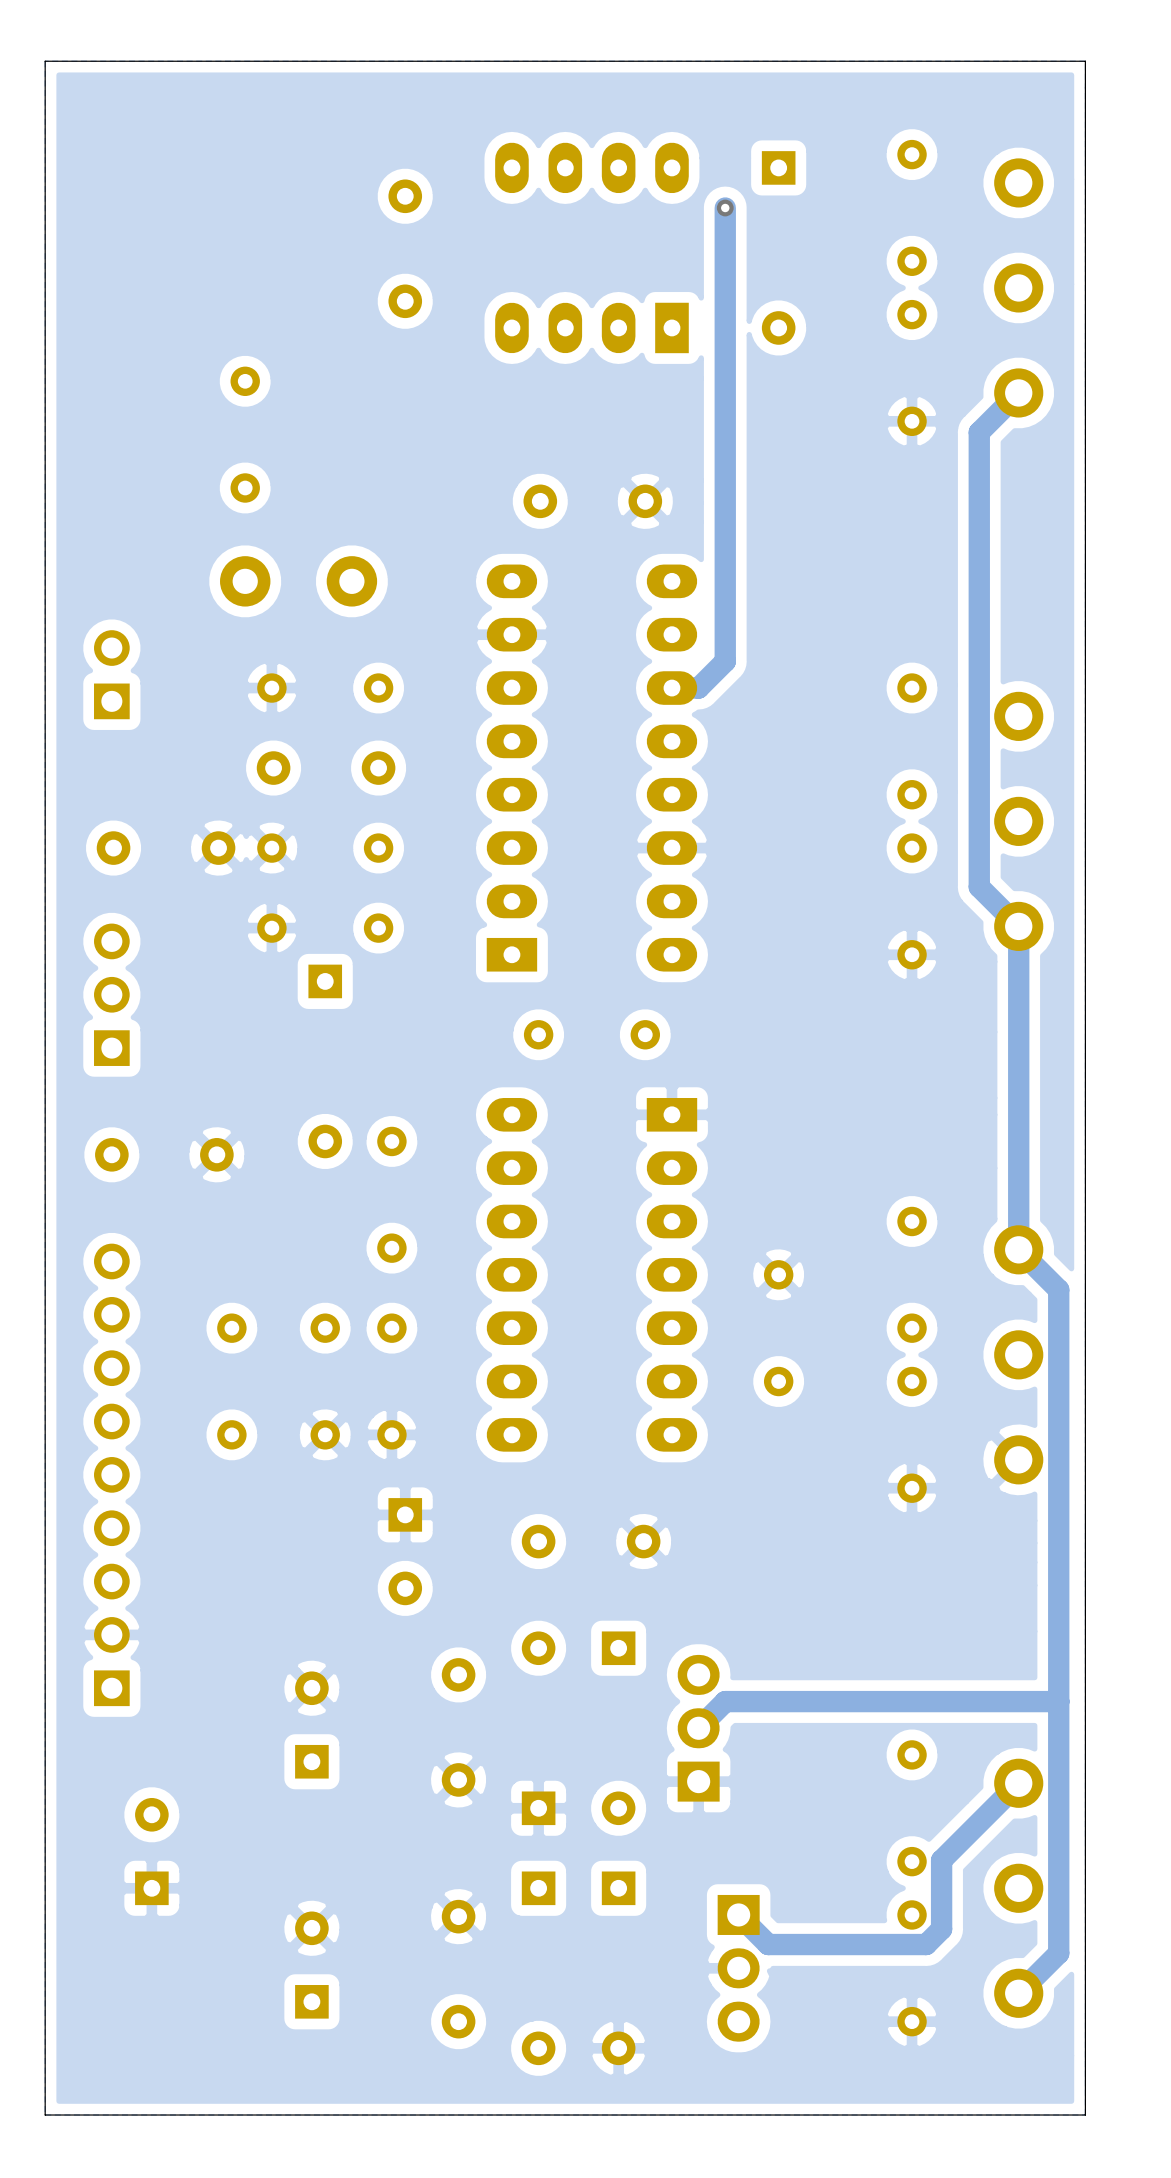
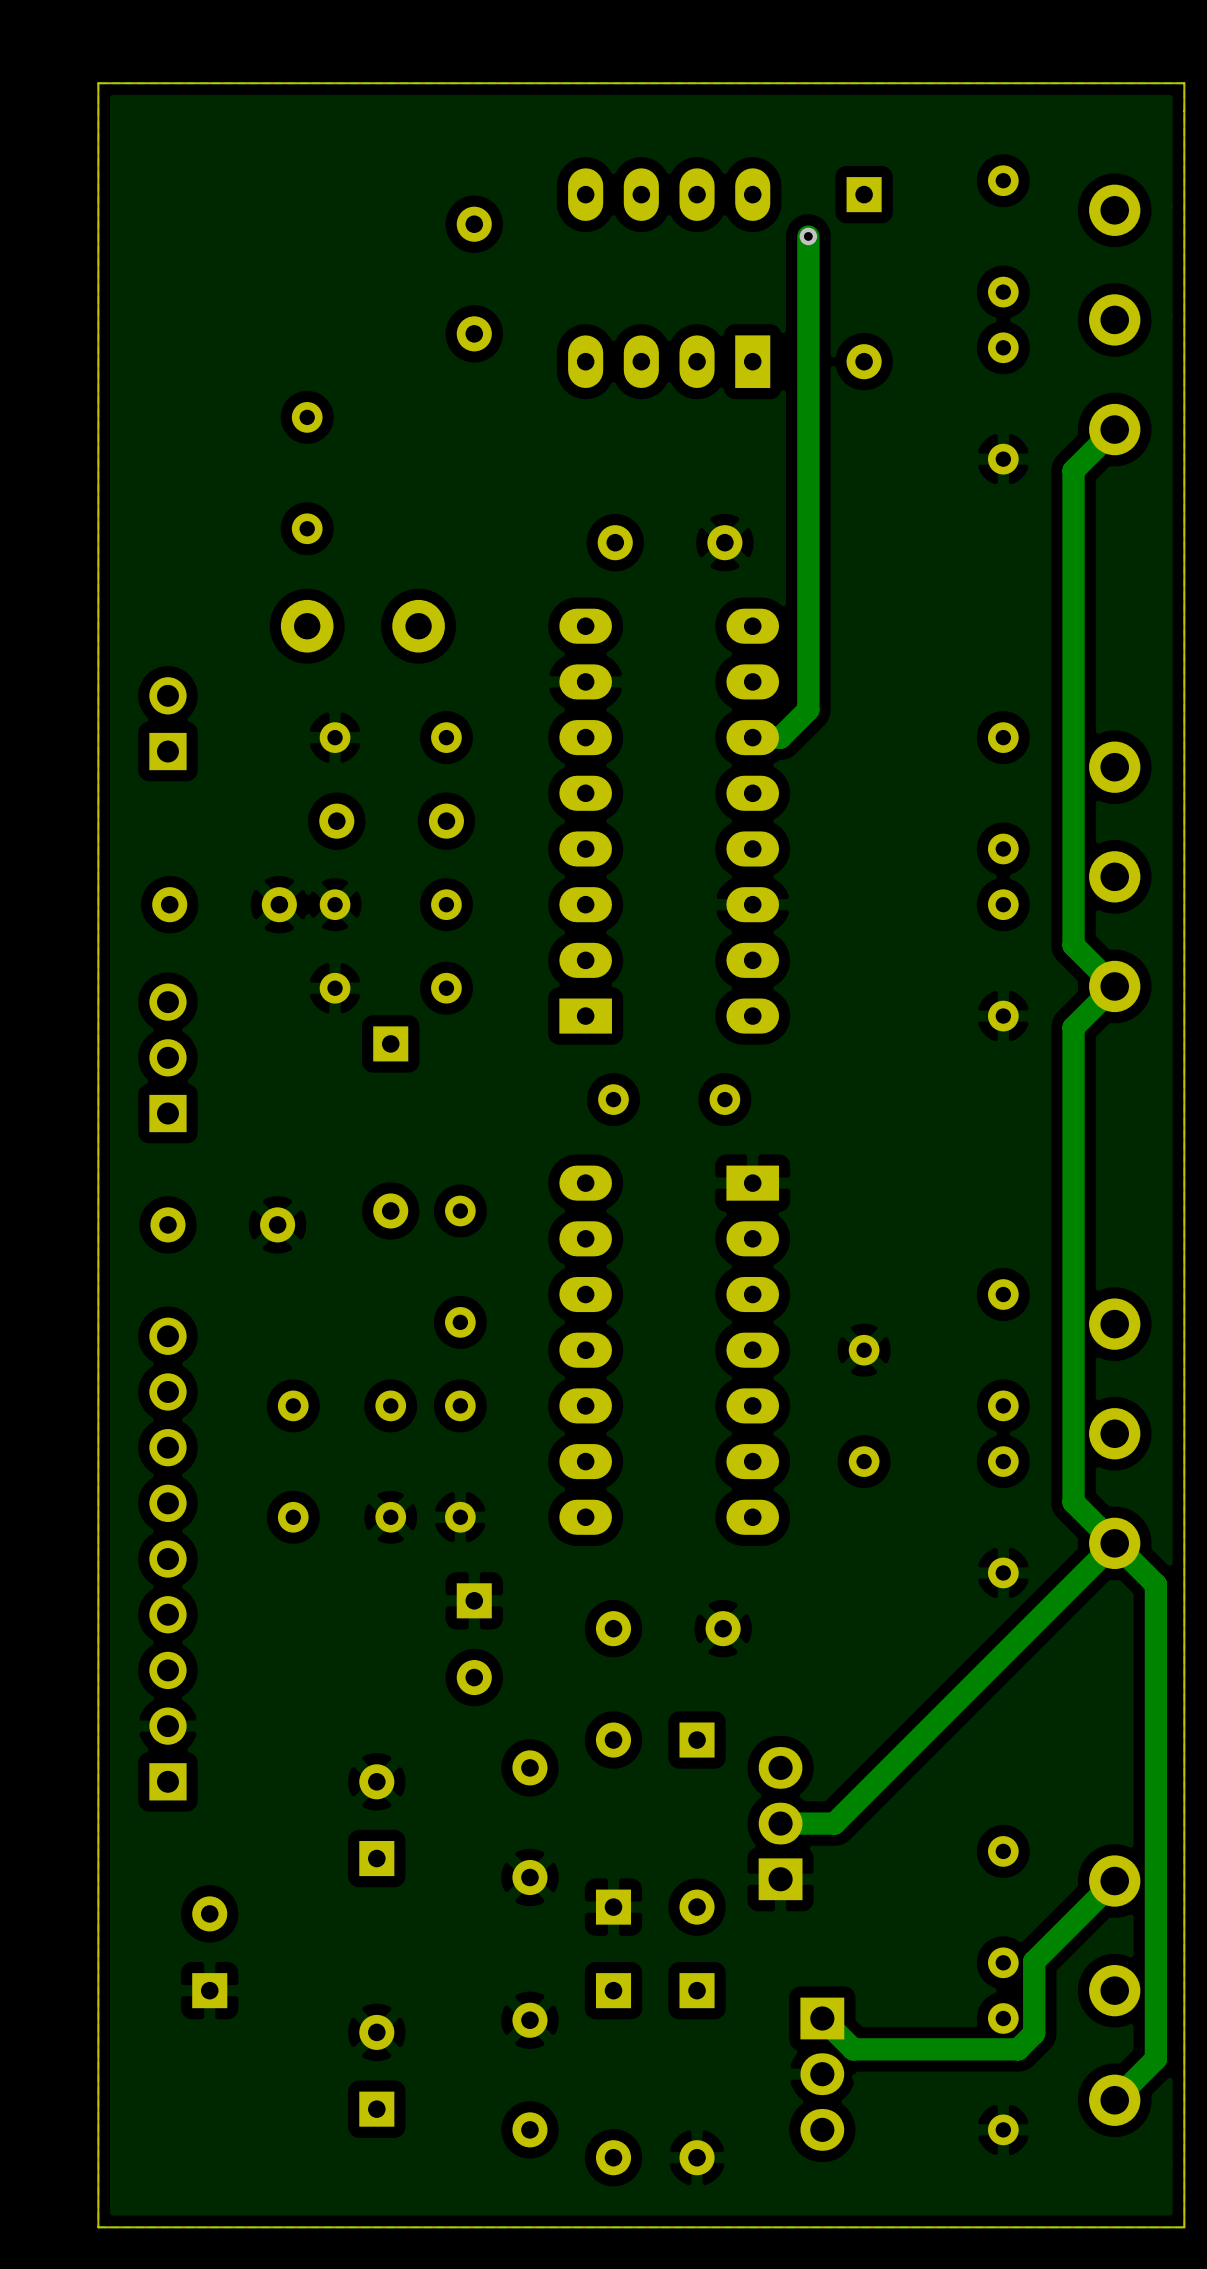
track: (1018, 926) (1018, 1249) (1058, 1289) (1058, 1953) -> (1114, 986) (1073, 1027) (1073, 1502) (1155, 1584) (1155, 2059)
track: (1058, 1701) (725, 1701) (698, 1728) -> (1114, 1543) (834, 1823) (780, 1823)

